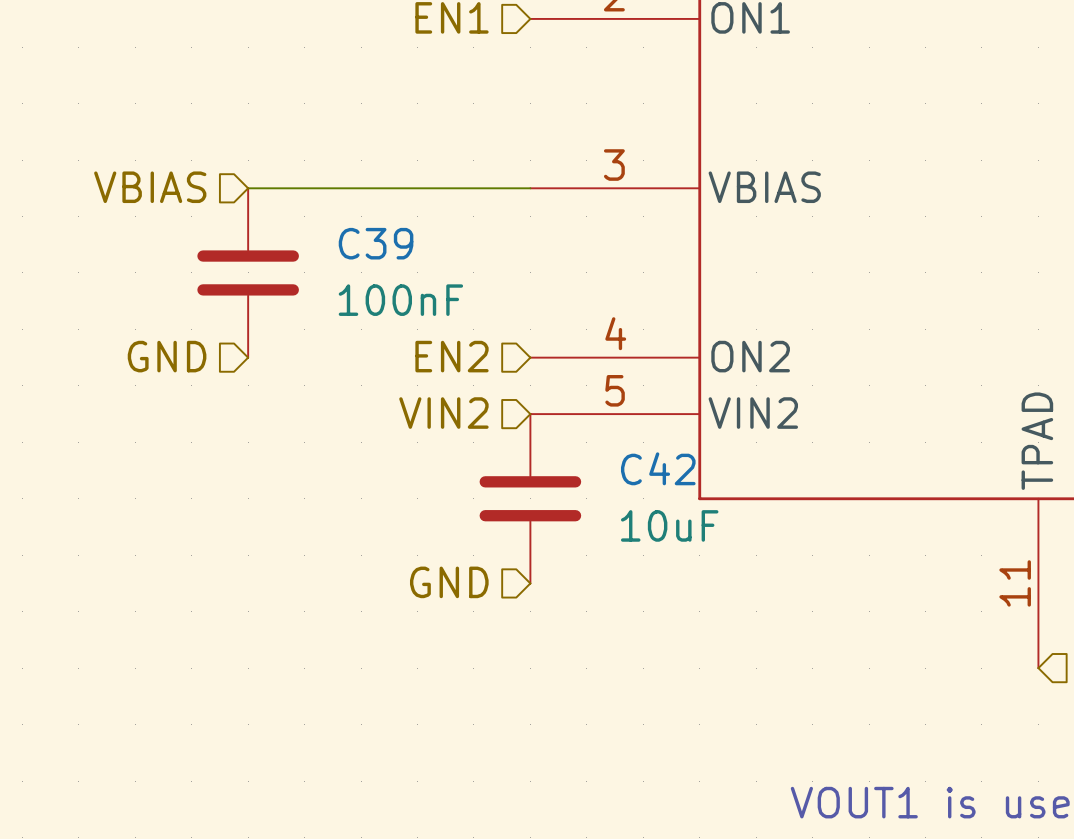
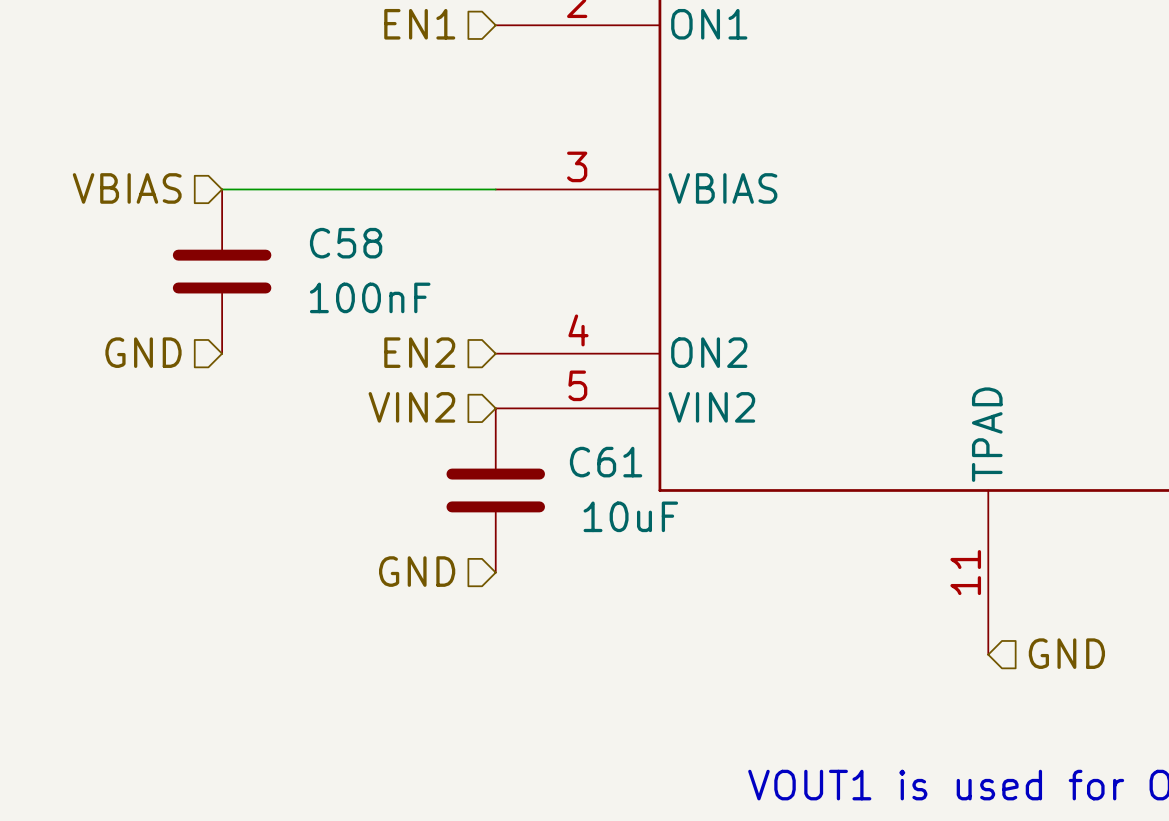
C39 name: C39 (376, 243) -> C58 (346, 243)
C42 name: C42 (658, 468) -> C61 (606, 462)

